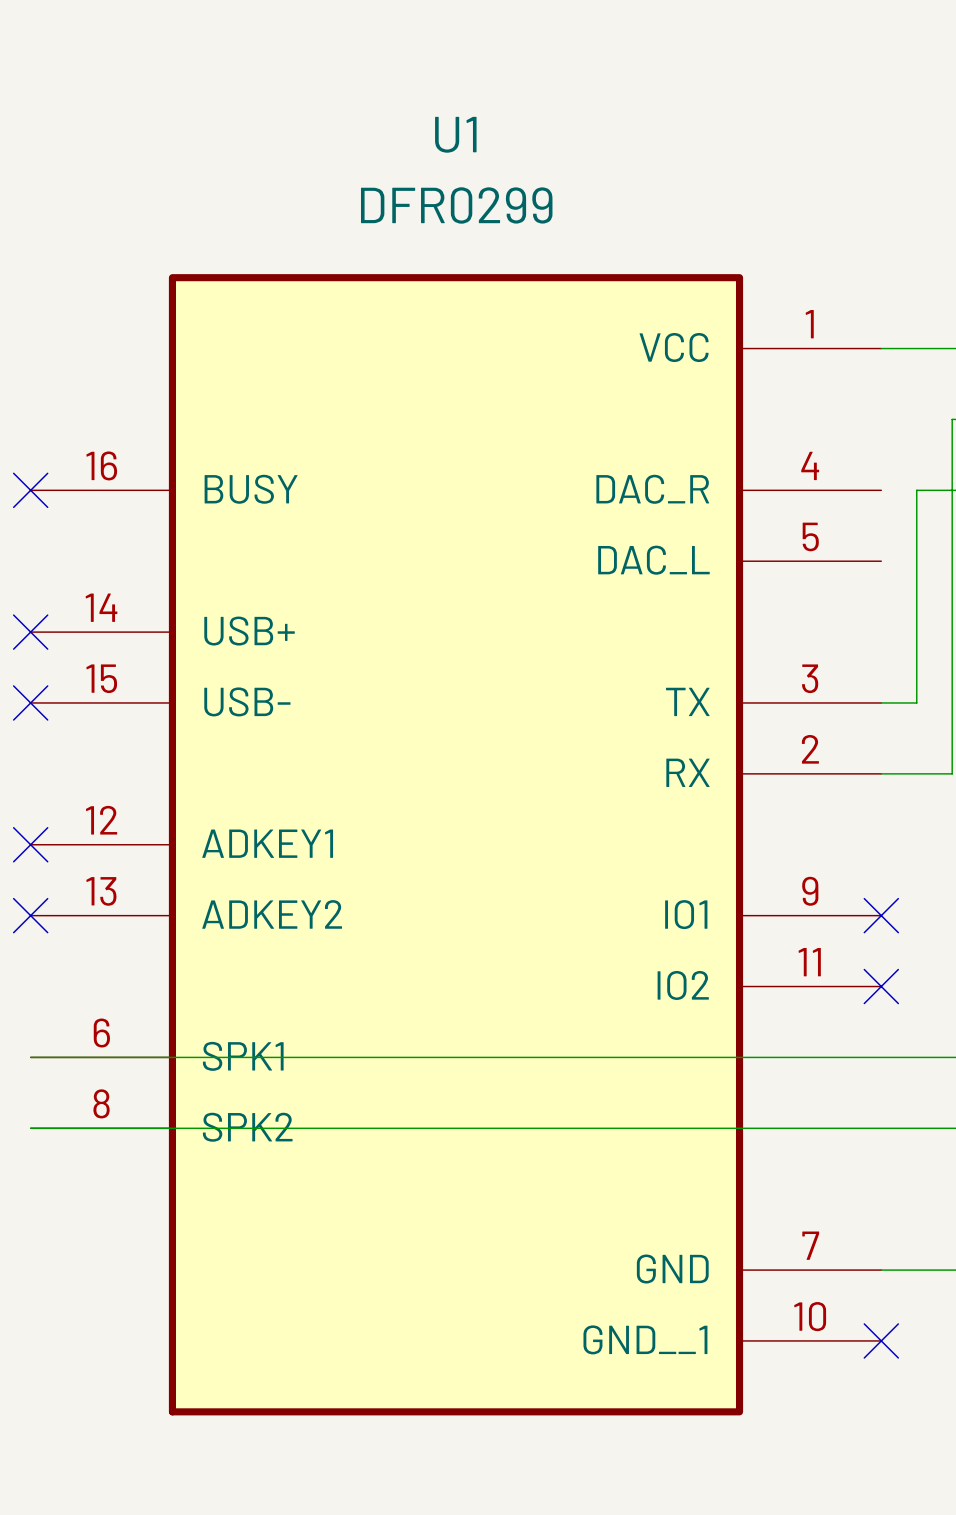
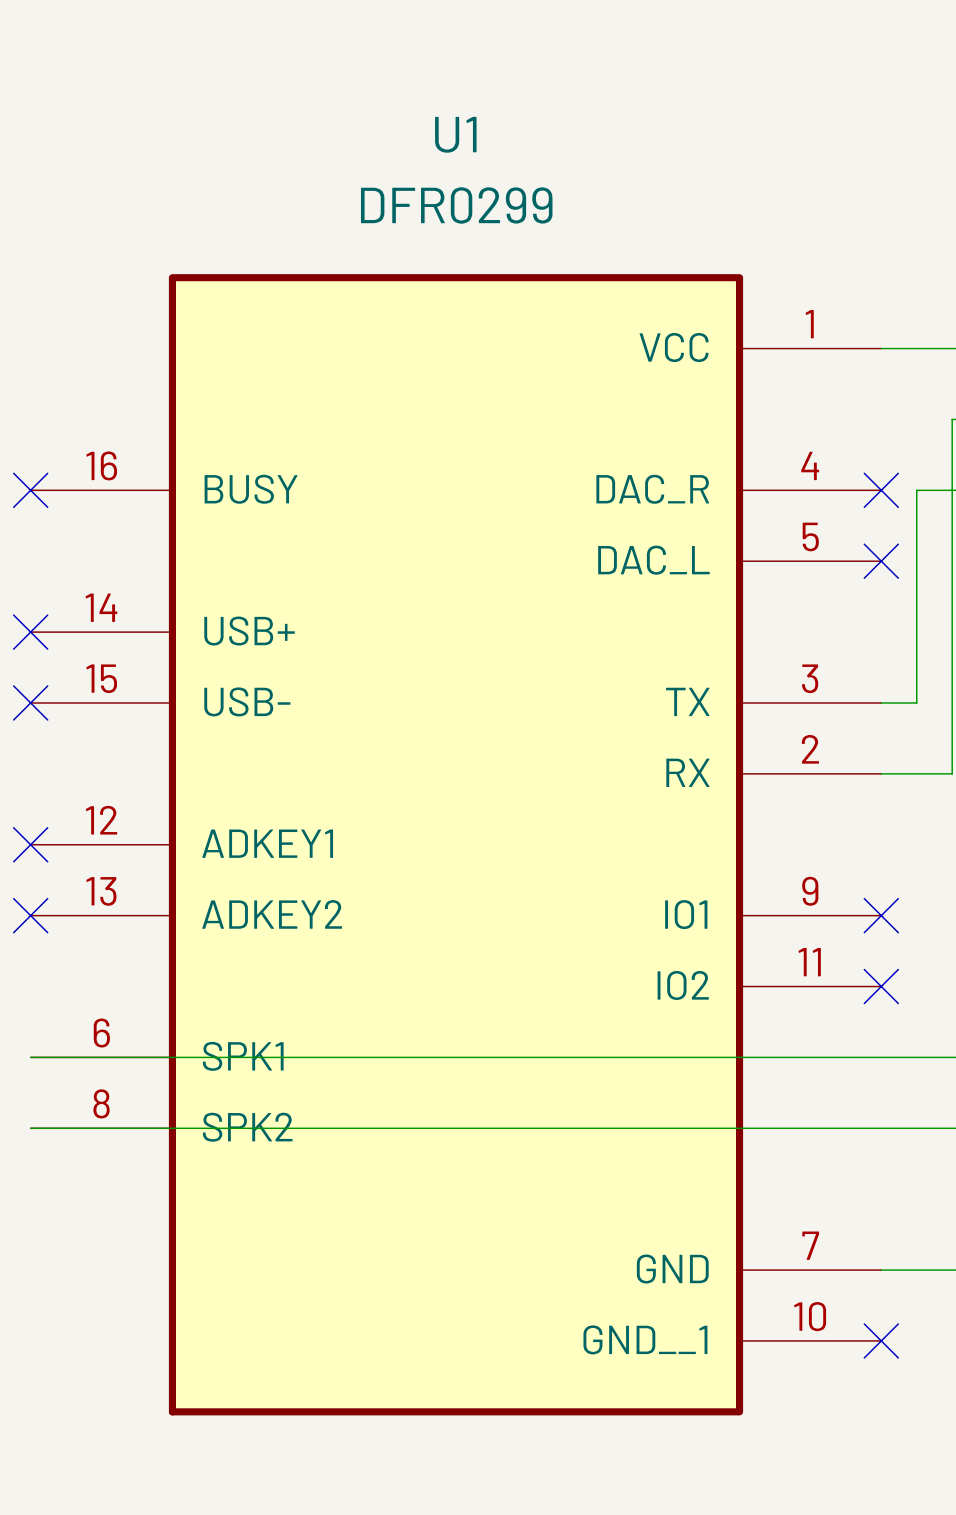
no-connect mark: none -> (881, 490)
no-connect mark: none -> (881, 561)

